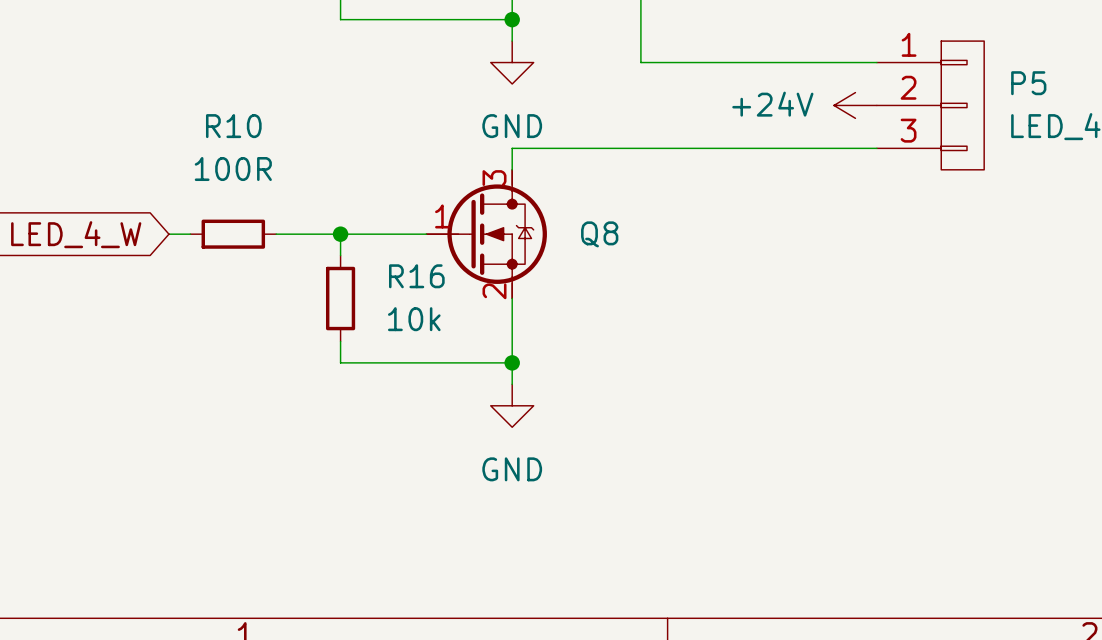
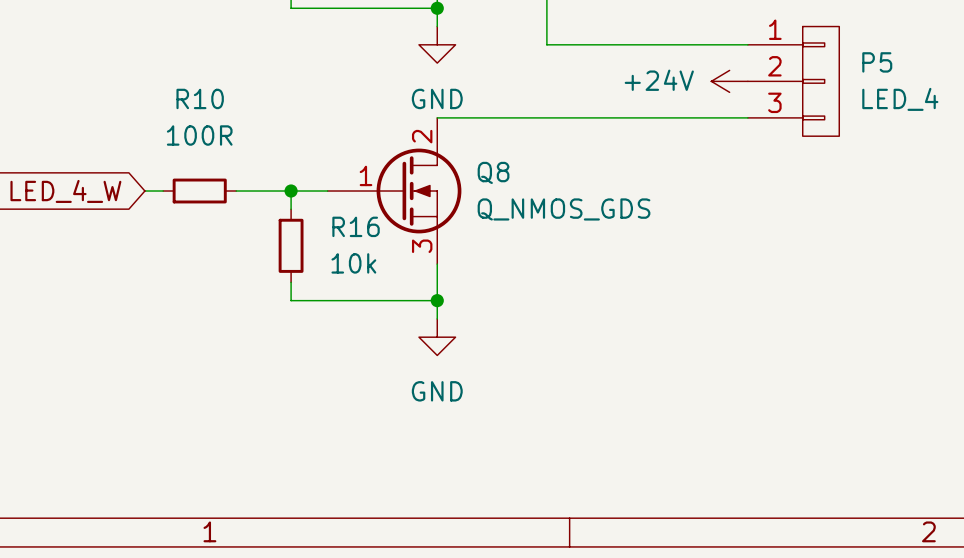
Q8 symbol: [426, 169, 547, 299] -> [327, 117, 462, 265]
Q8 value: none -> Q_NMOS_GDS (564, 209)

